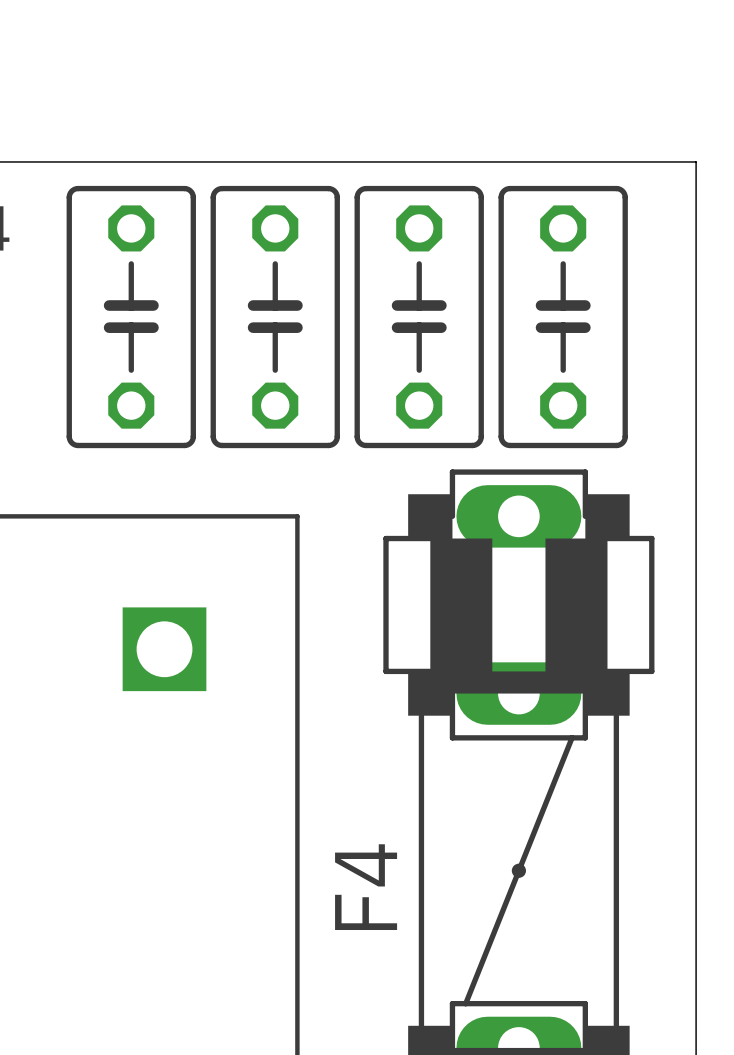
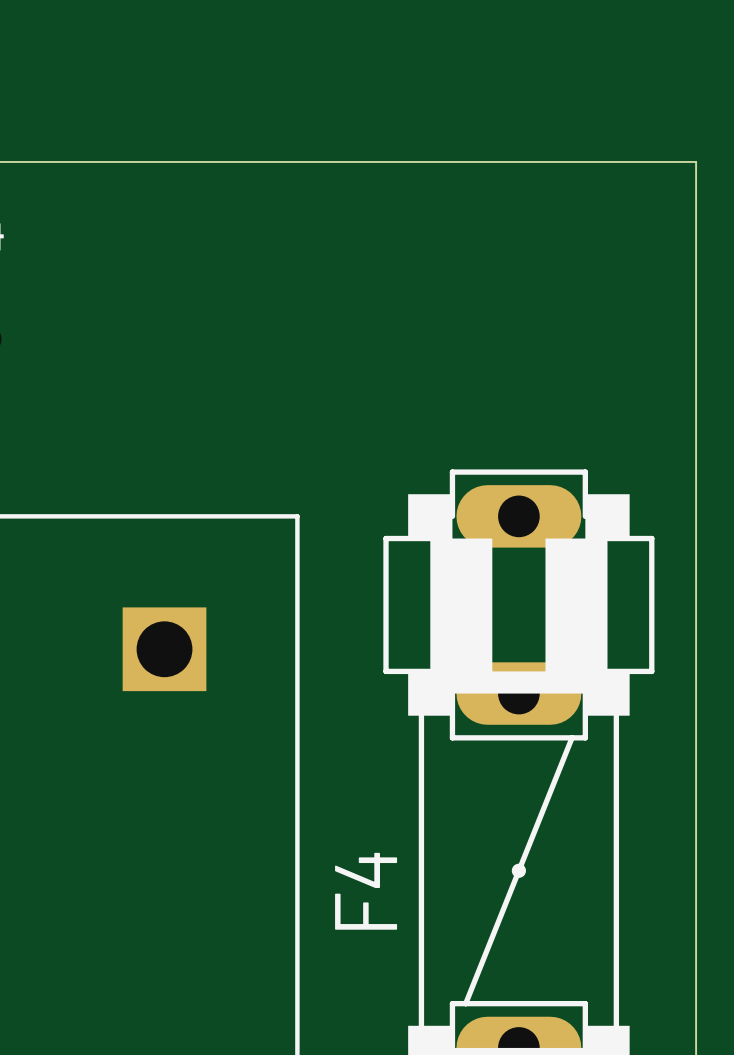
part: (131, 317) -> none
part: (275, 317) -> none
part: (419, 317) -> none
part: (563, 317) -> none

